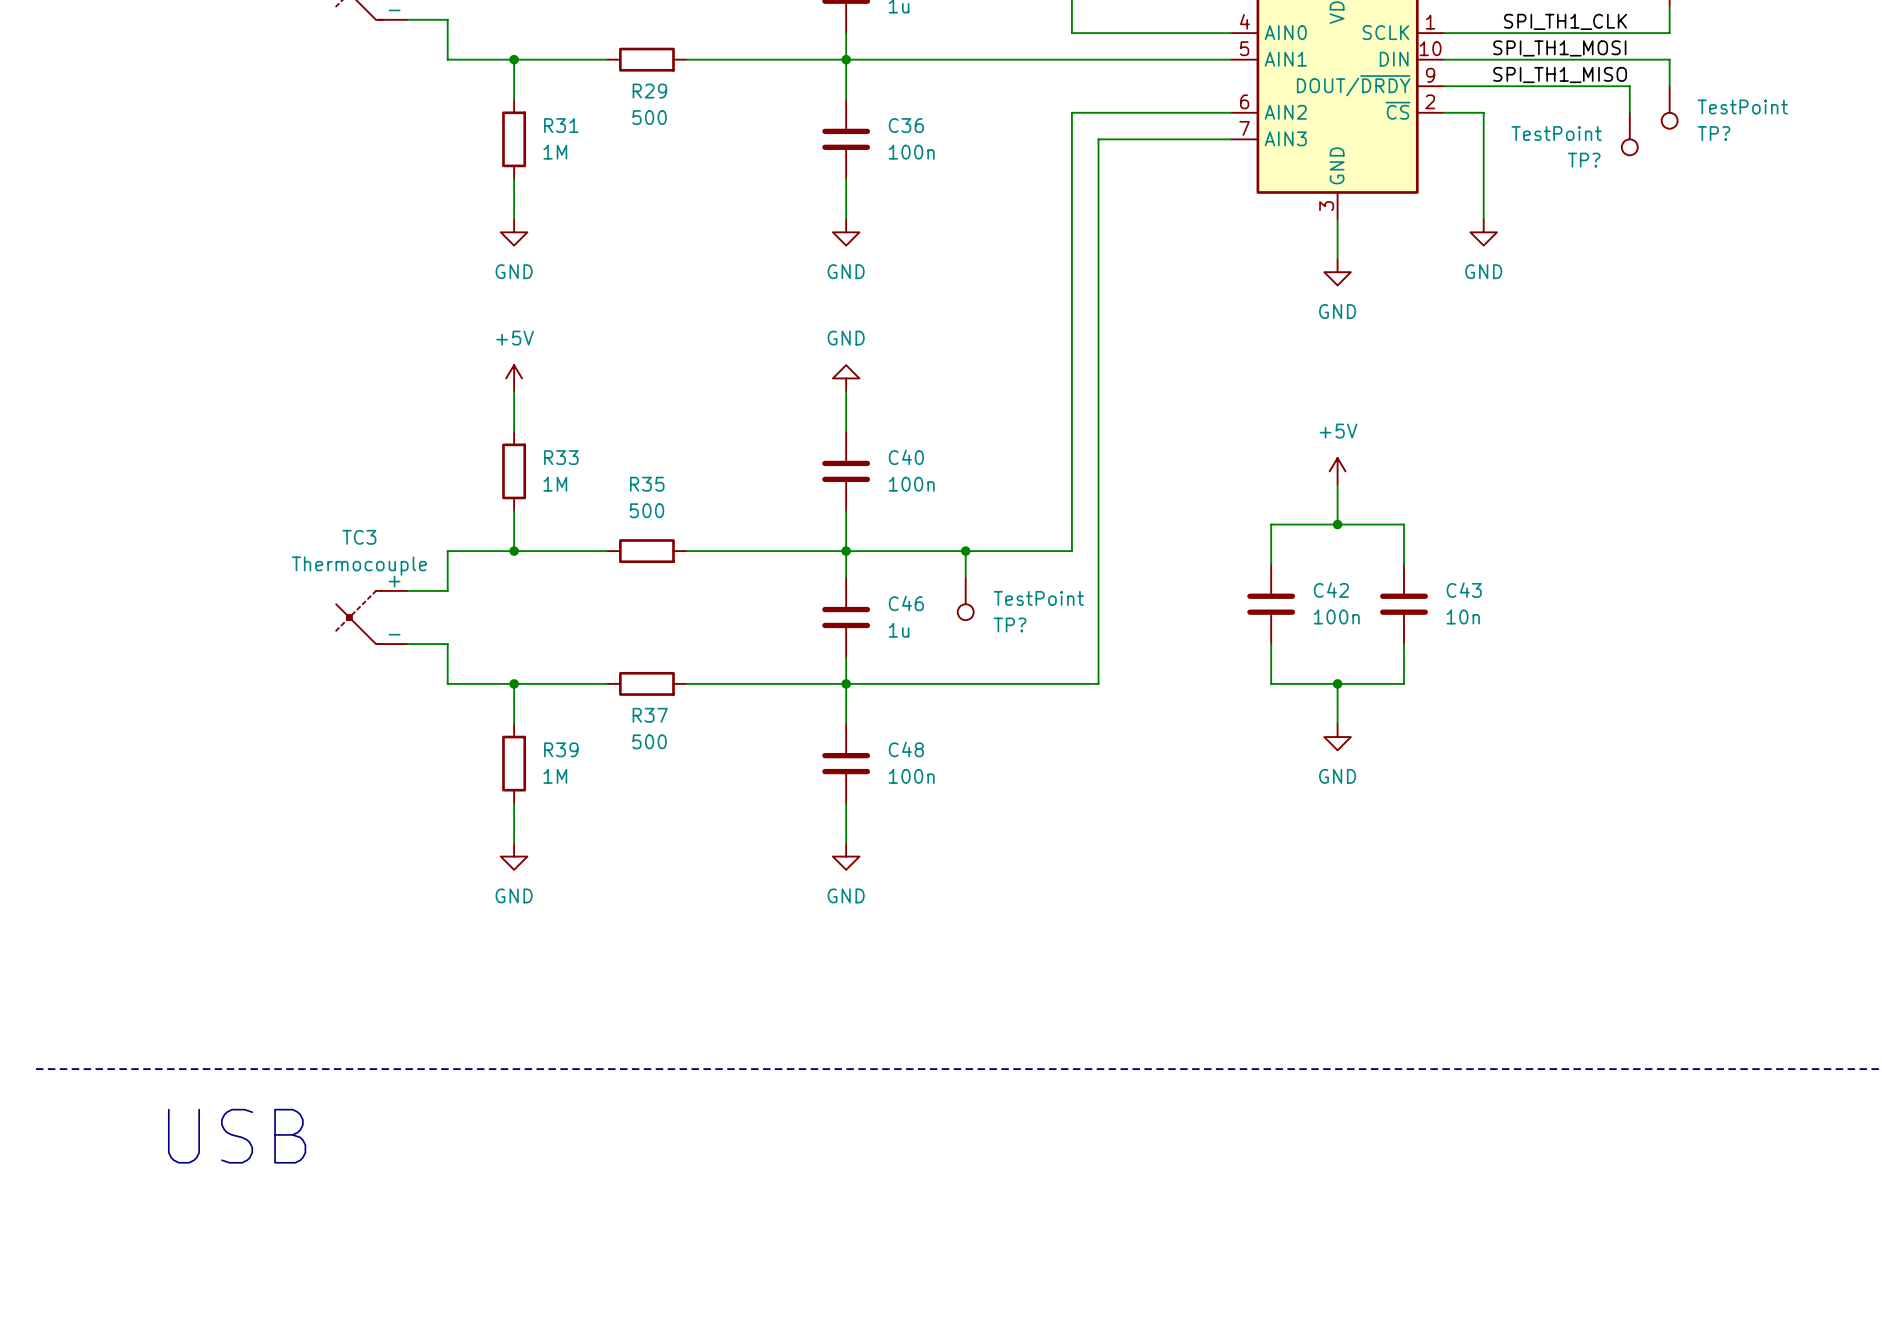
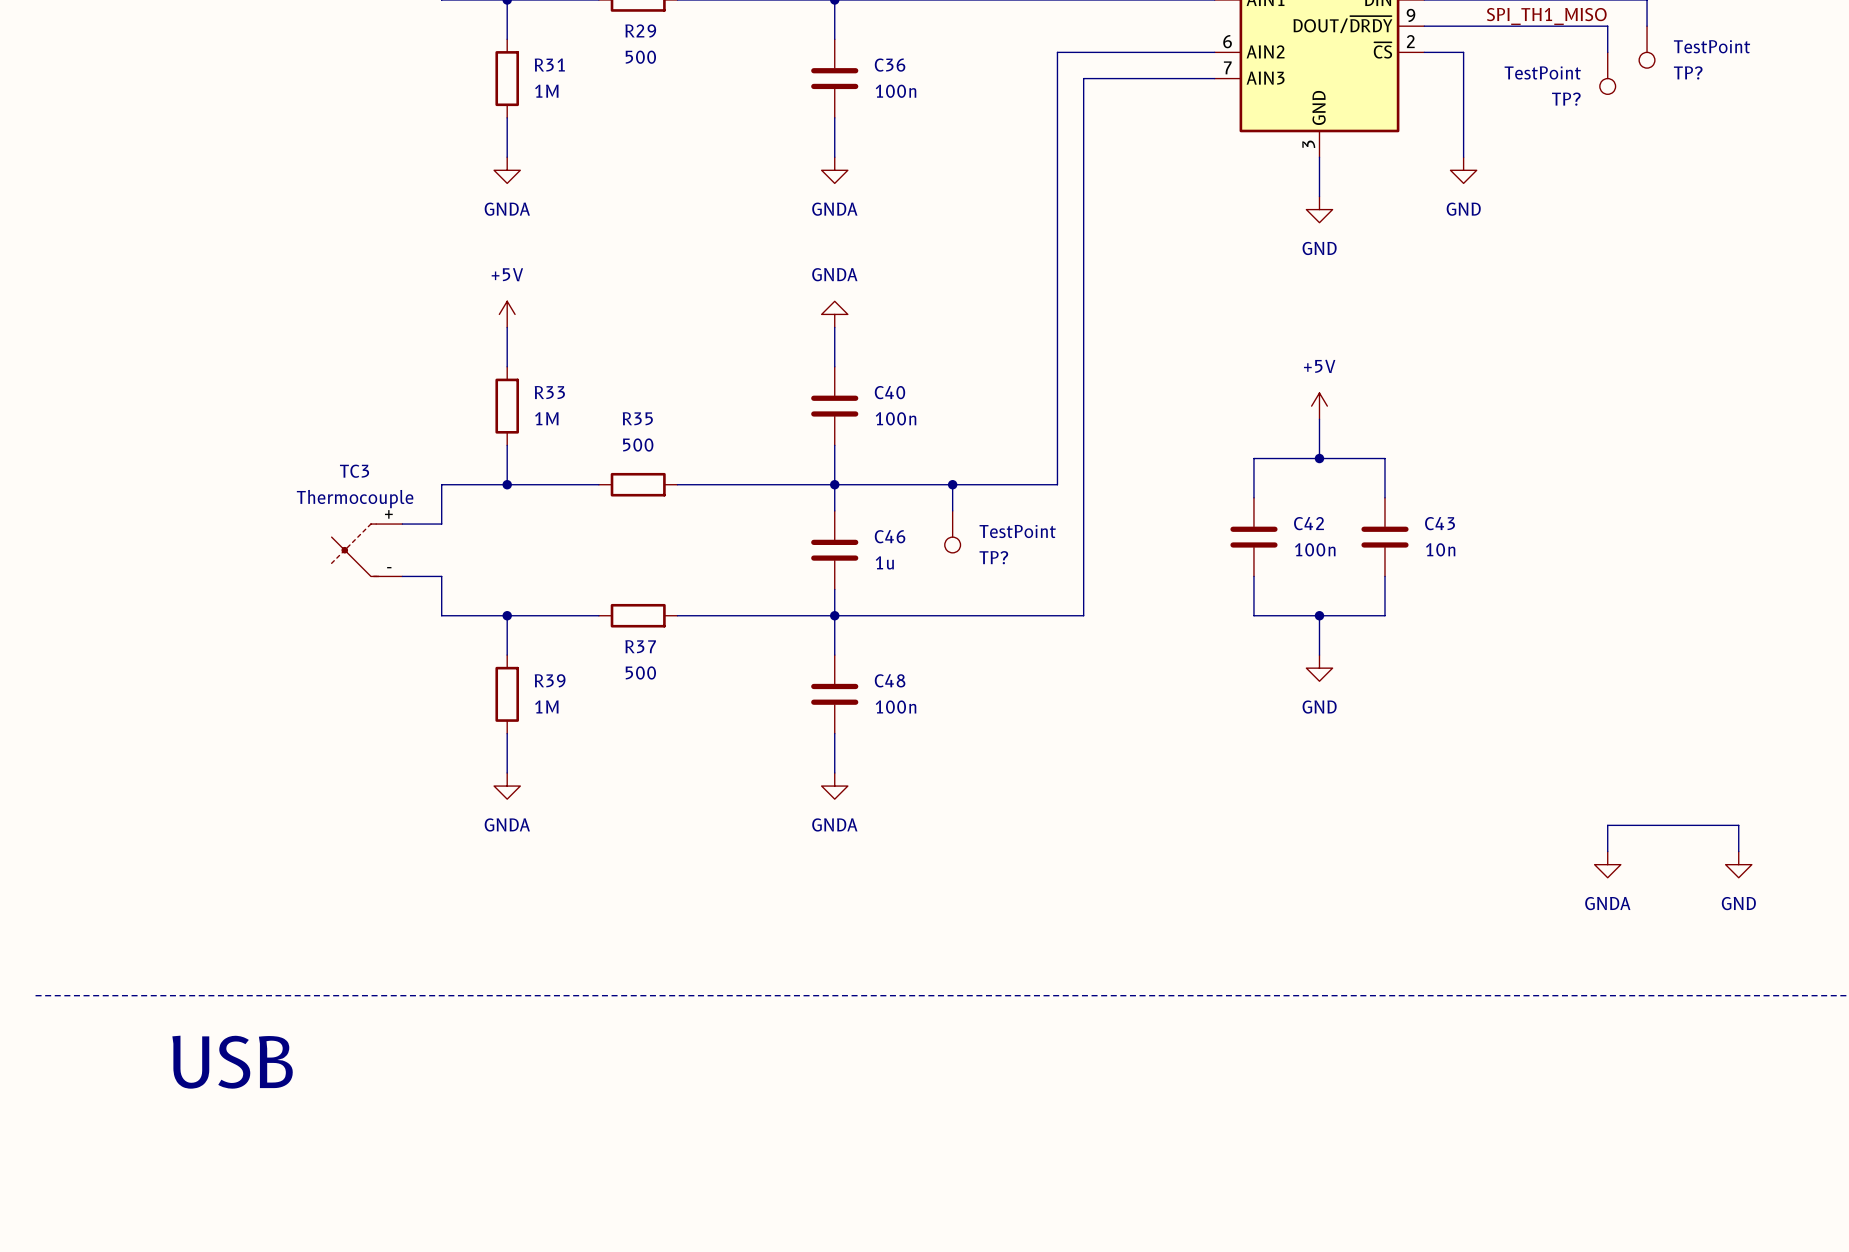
power symbol: GND (514, 232) -> GNDA (507, 170)
power symbol: GND (846, 232) -> GNDA (834, 170)
power symbol: GND (846, 378) -> GNDA (834, 314)
power symbol: GND (514, 856) -> GNDA (507, 786)
power symbol: GND (846, 856) -> GNDA (834, 786)
wire: none -> (1607, 851) (1607, 825) (1738, 825) (1738, 851)
power symbol: none -> GNDA (1607, 864)
power symbol: none -> GND (1738, 864)

